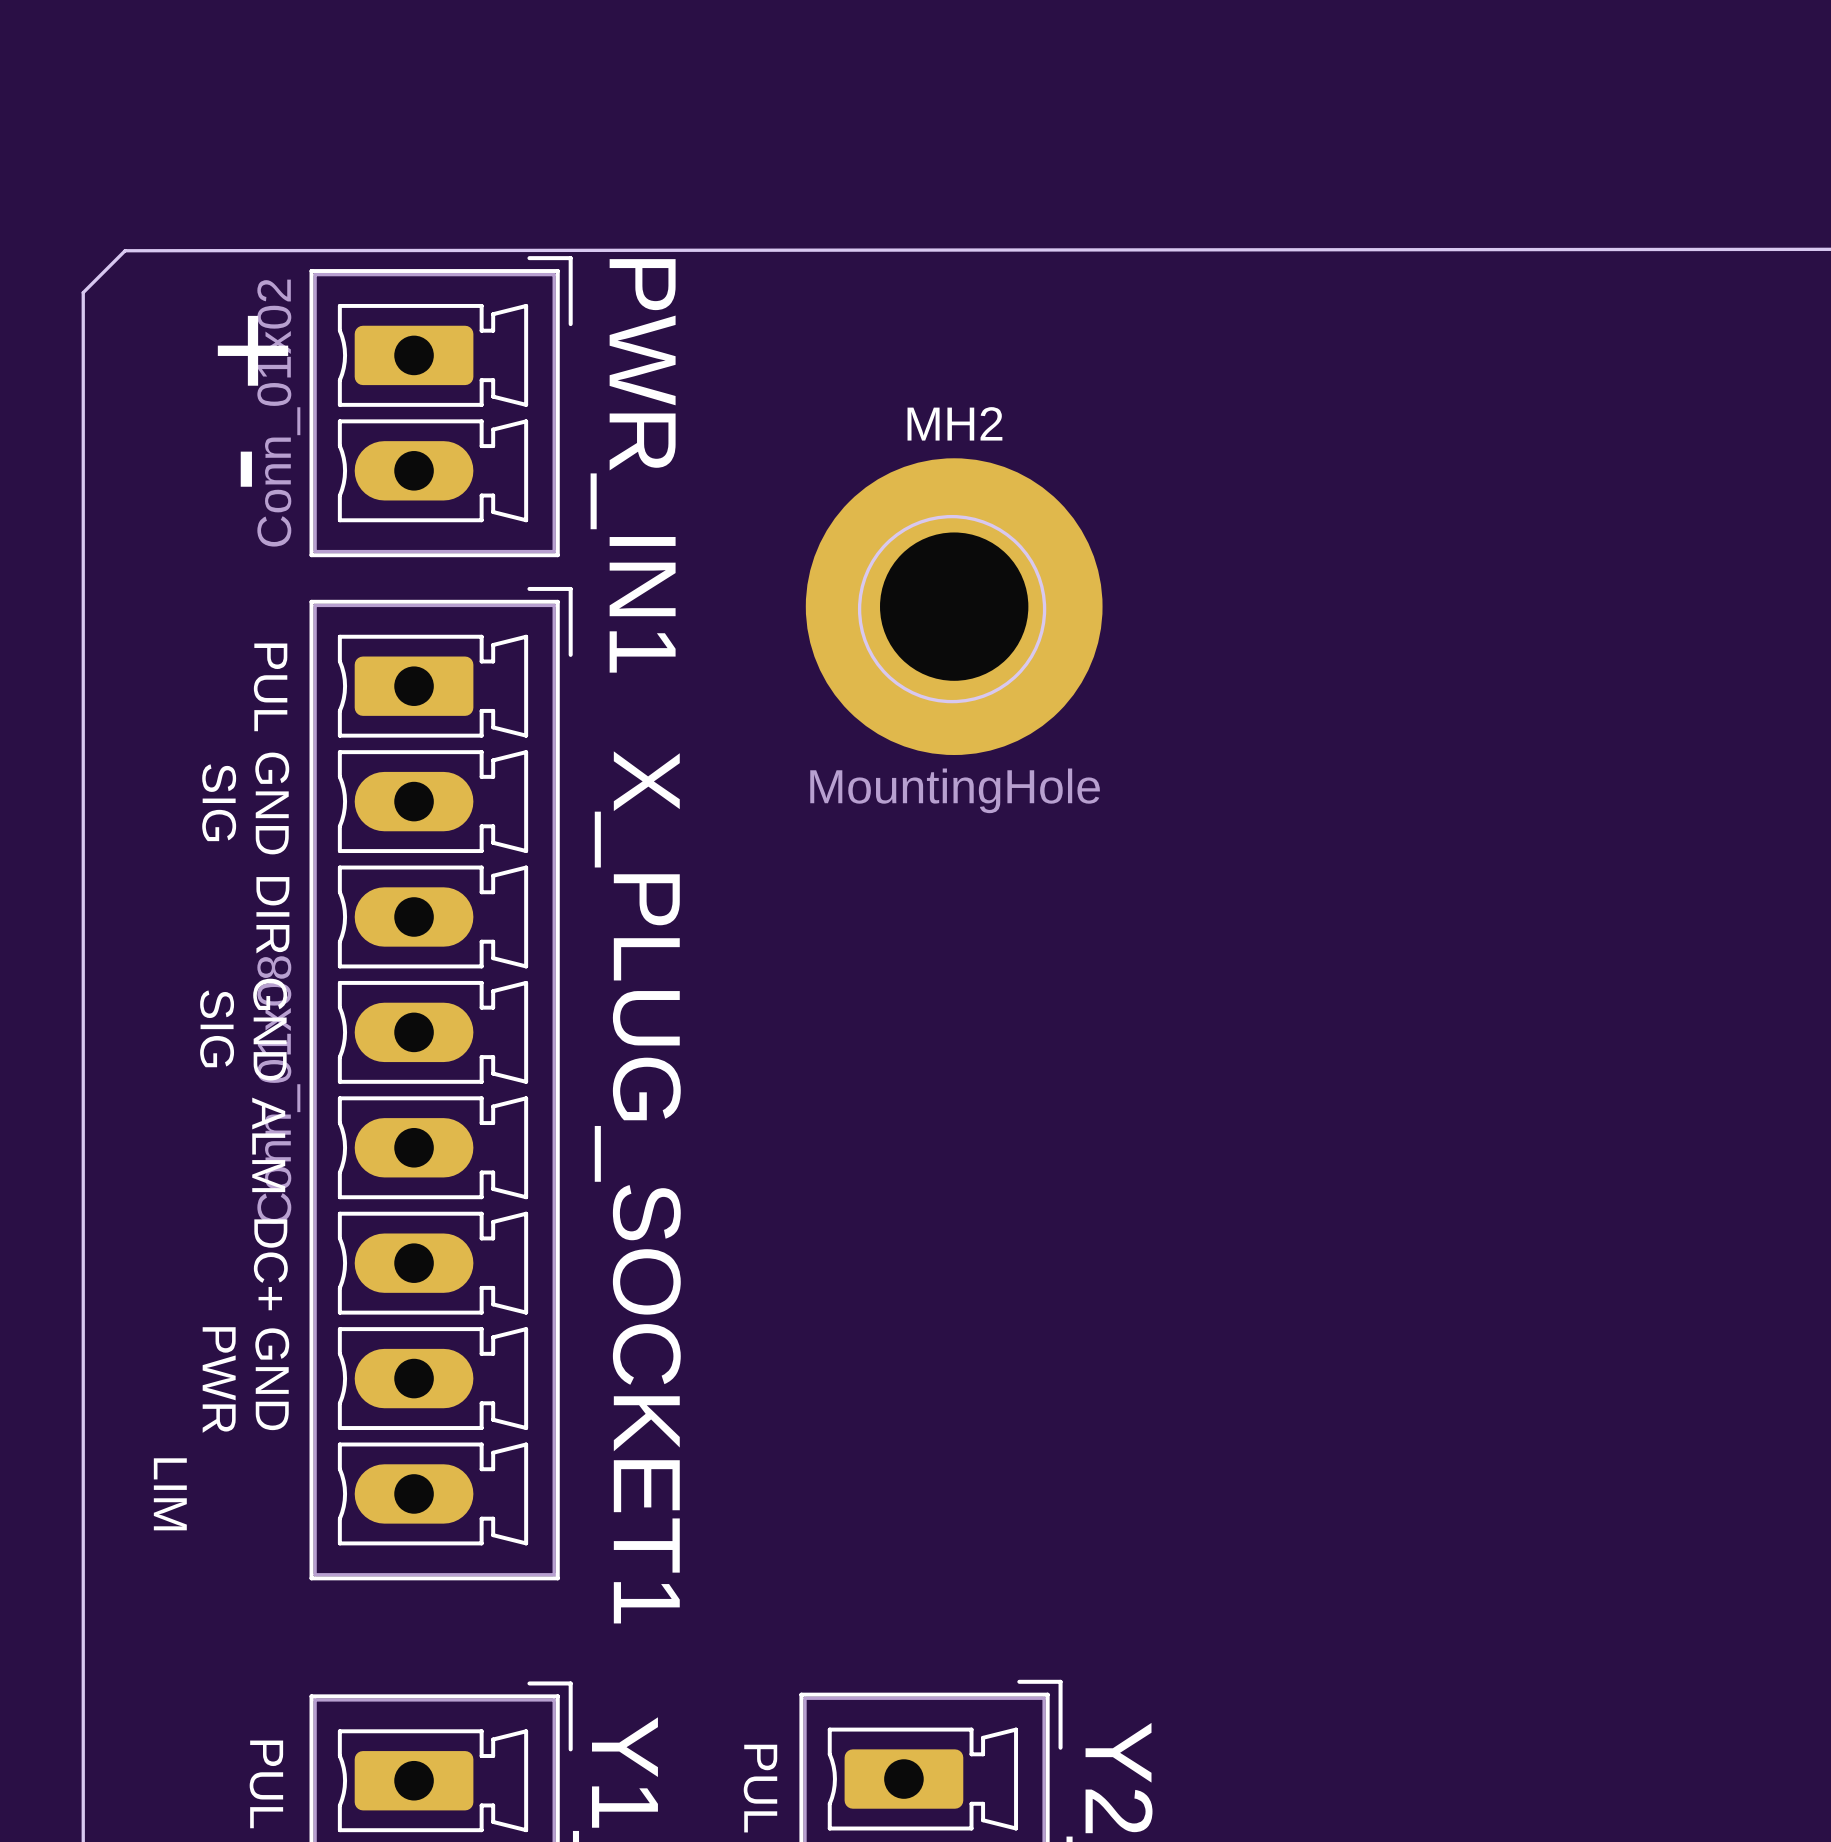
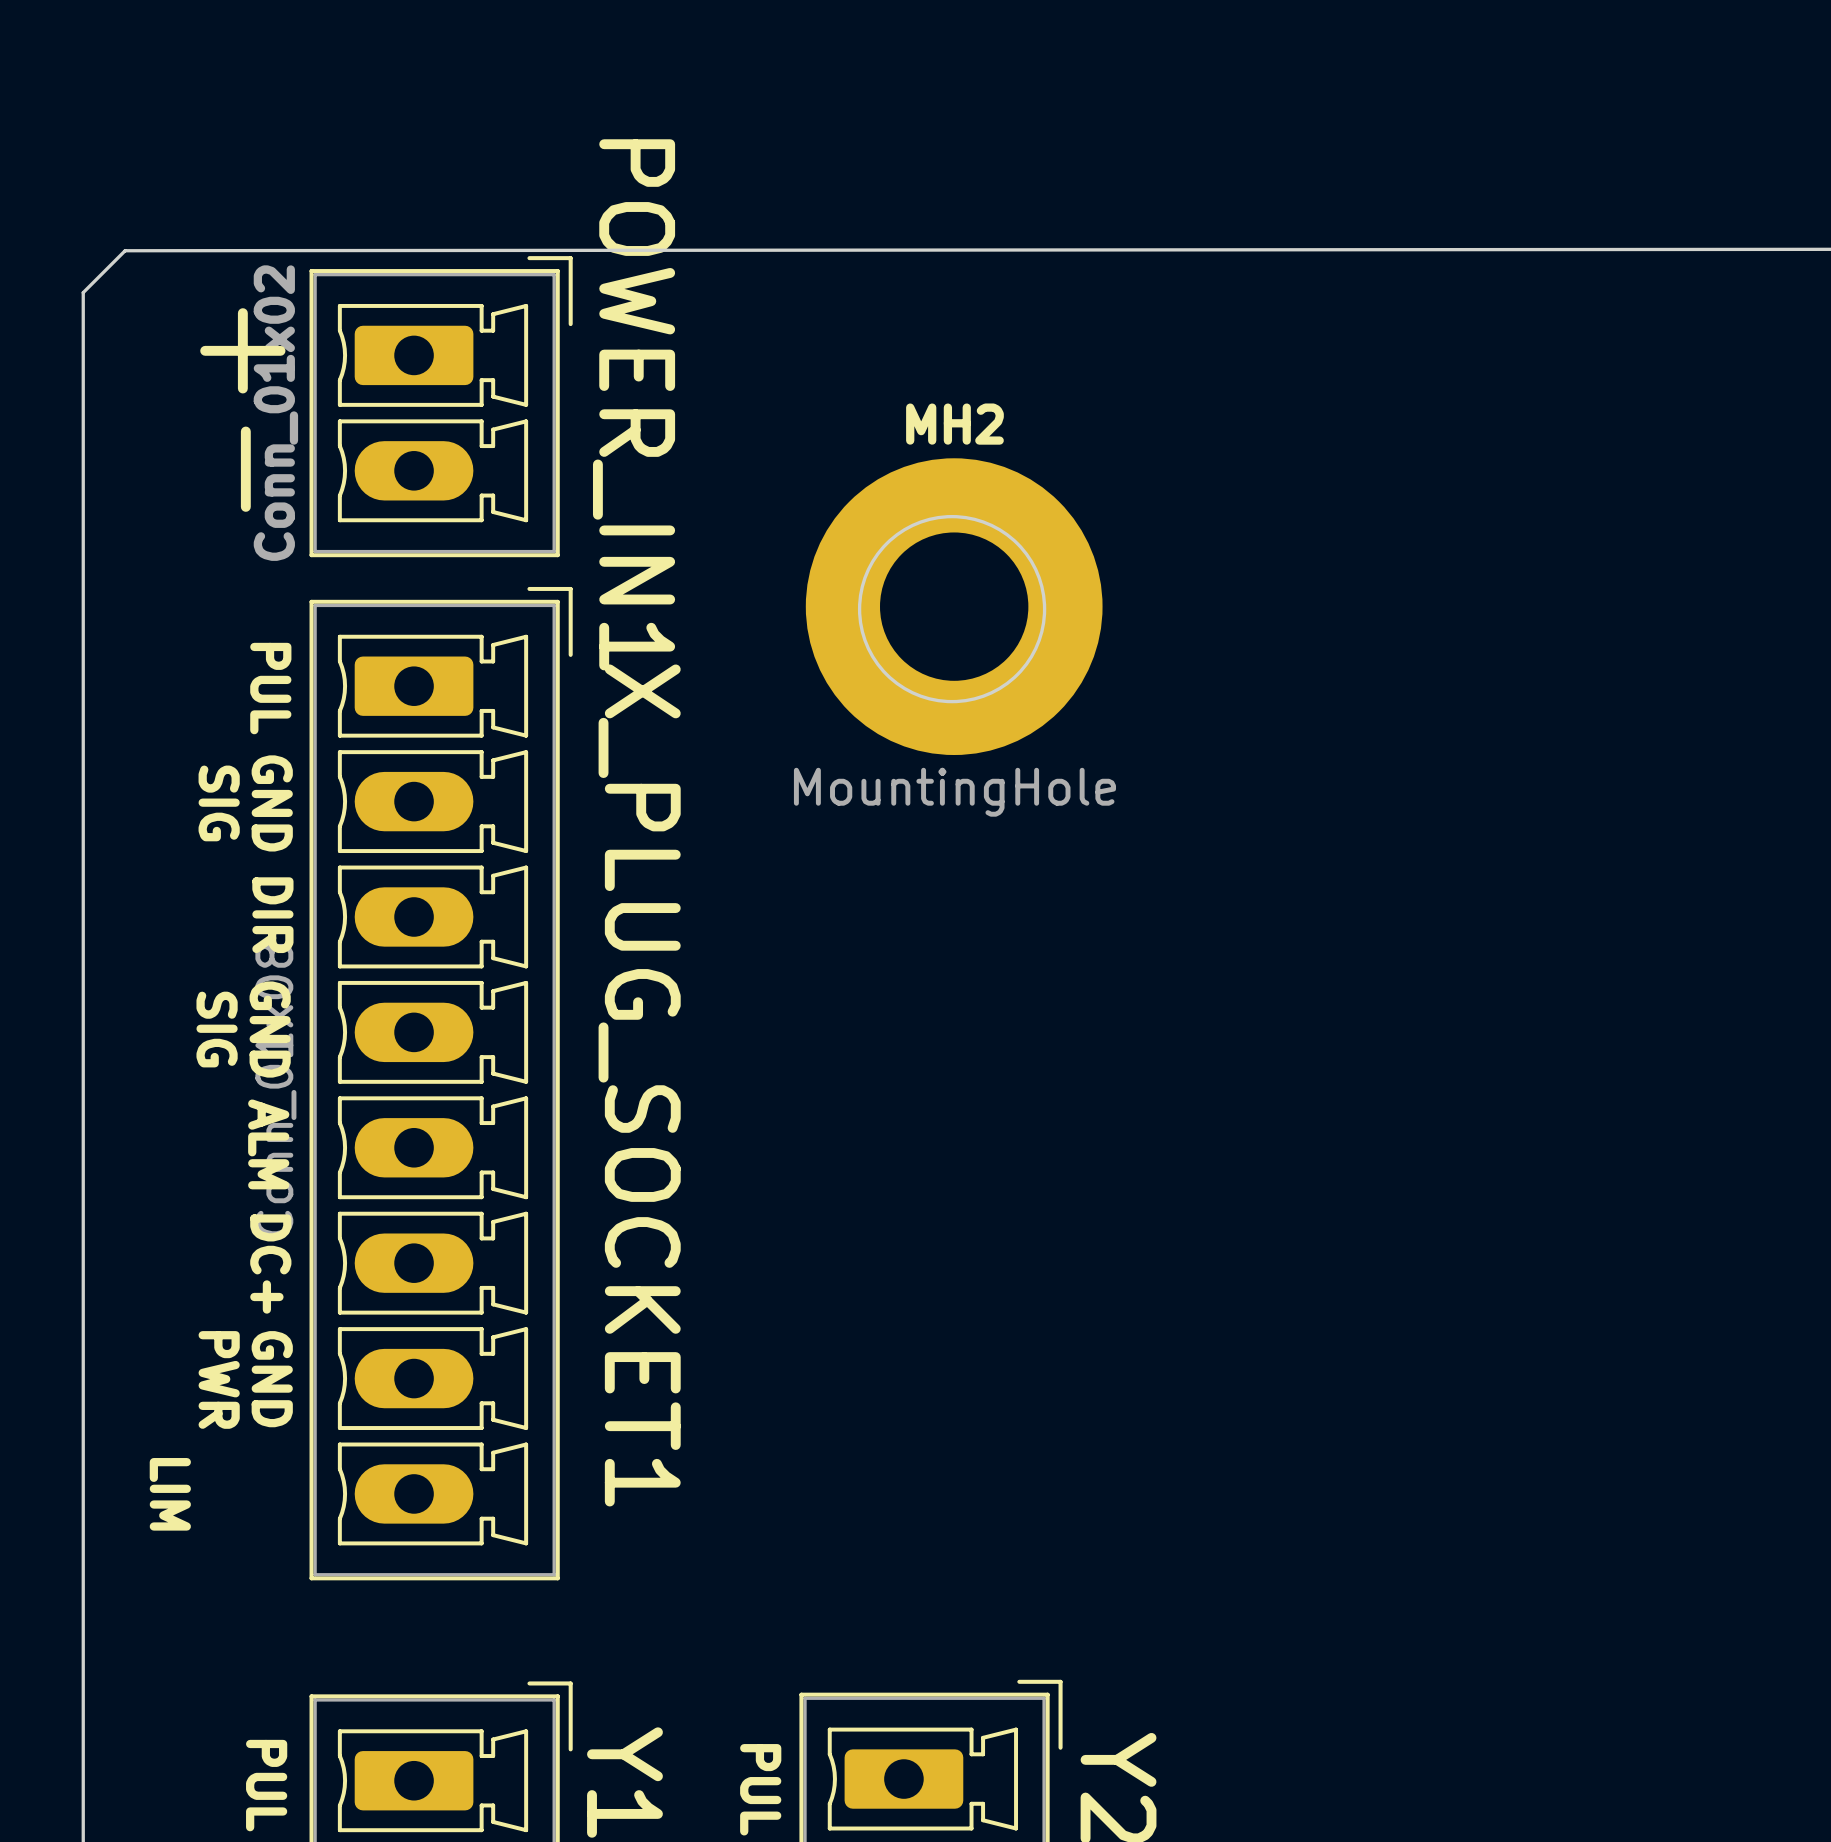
PWR_IN1 name: PWR_IN1 (633, 465) -> POWER_IN1 (634, 404)
X_PLUG_SOCKET1 name position: X_PLUG_SOCKET1 (637, 1187) -> X_PLUG_SOCKET1 (639, 1085)

